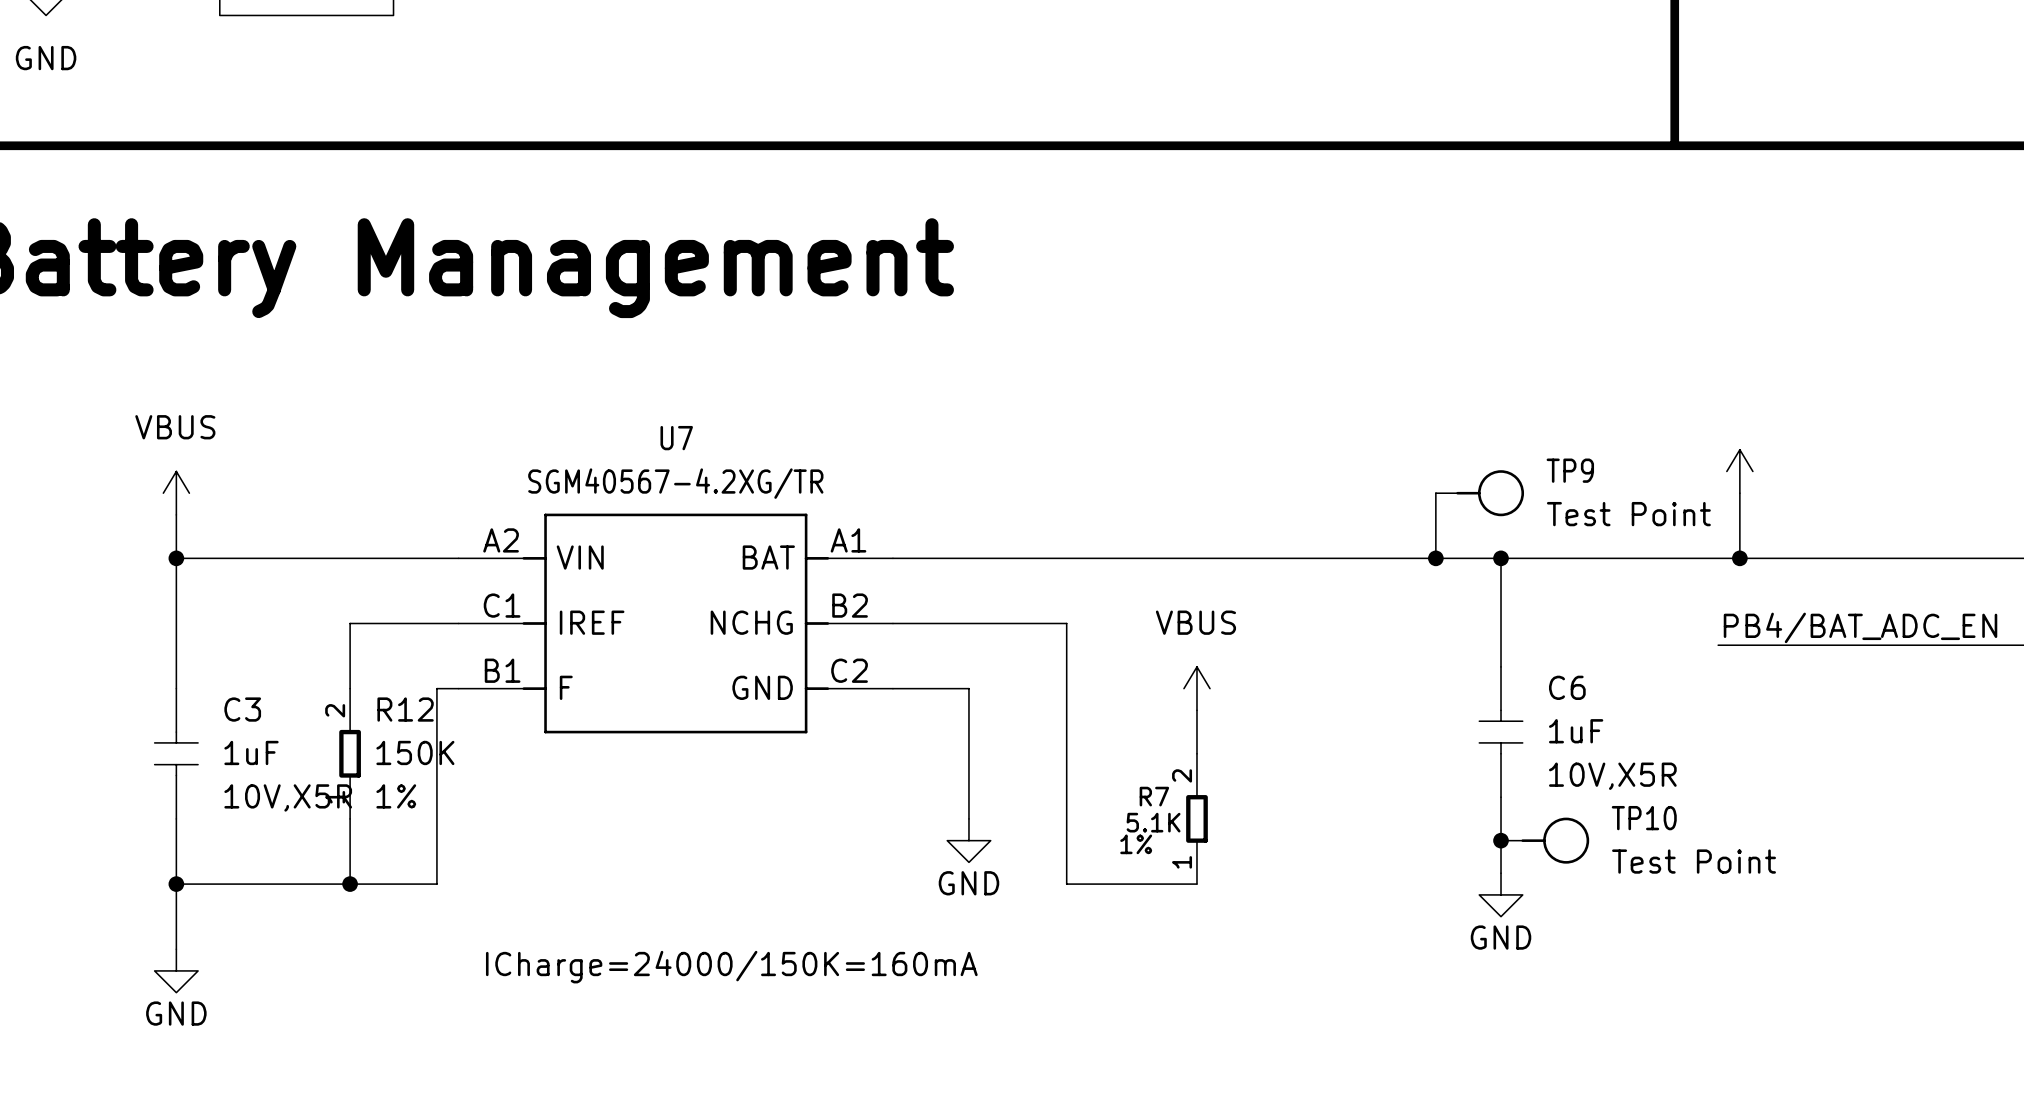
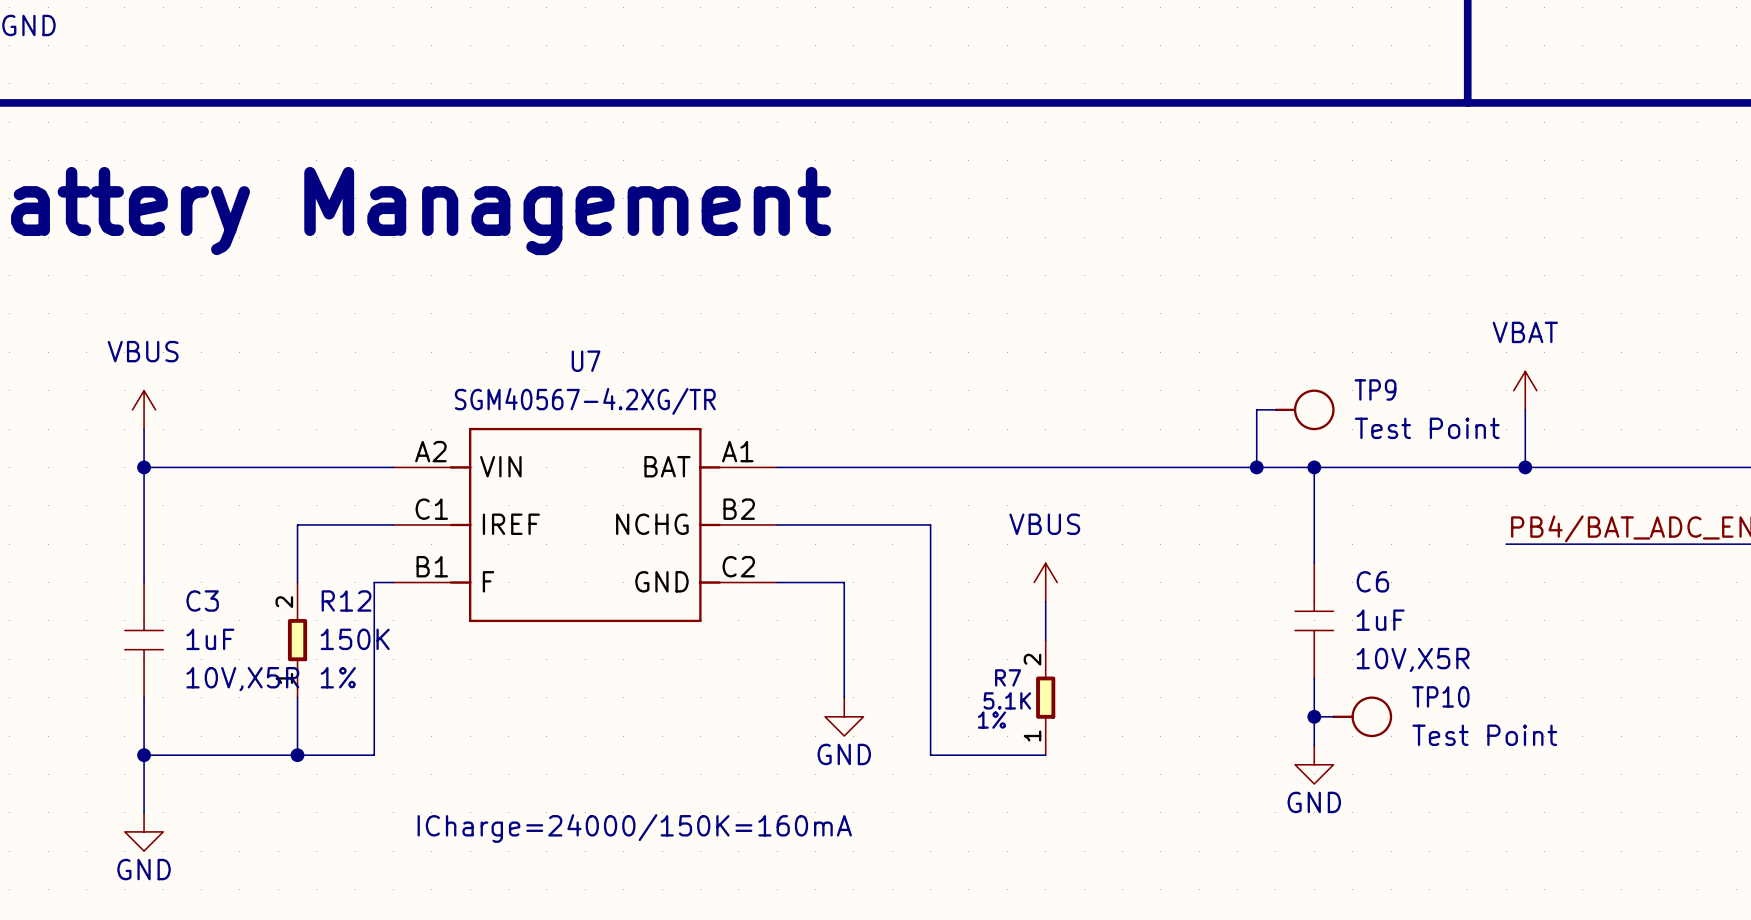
power symbol text: none -> VBAT (1525, 332)

